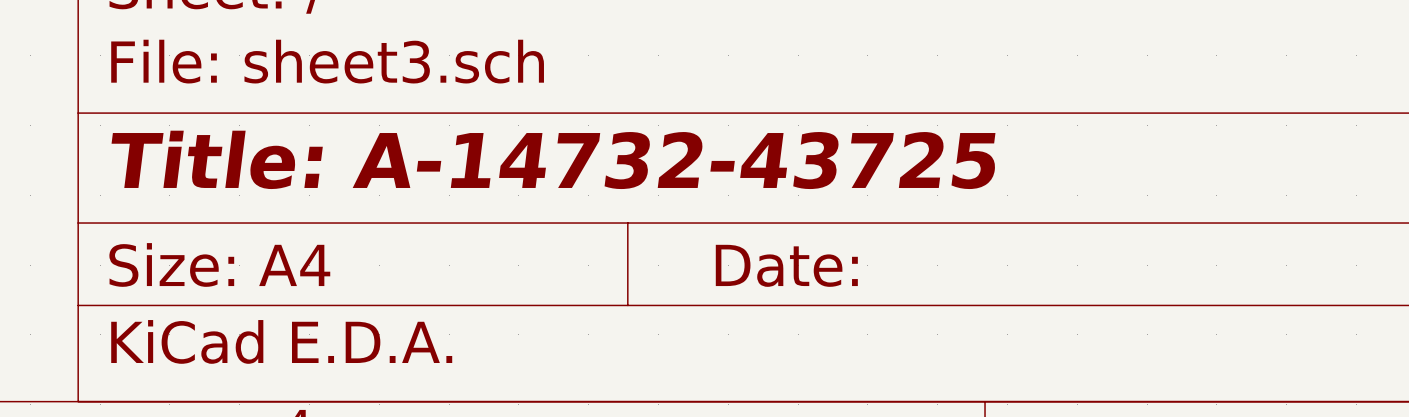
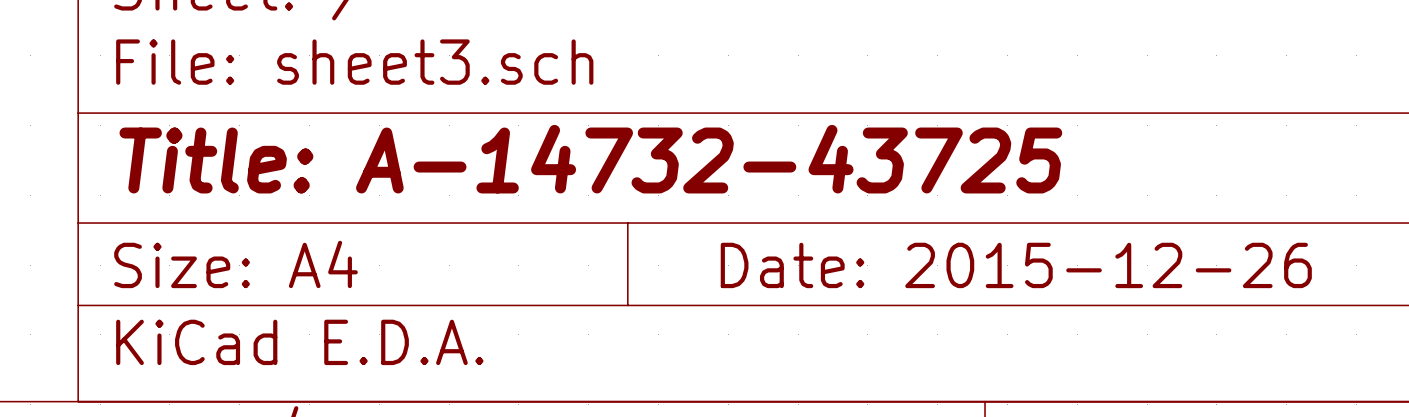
title block: Date: (786, 265) -> Date: 2015-12-26 (1016, 265)

